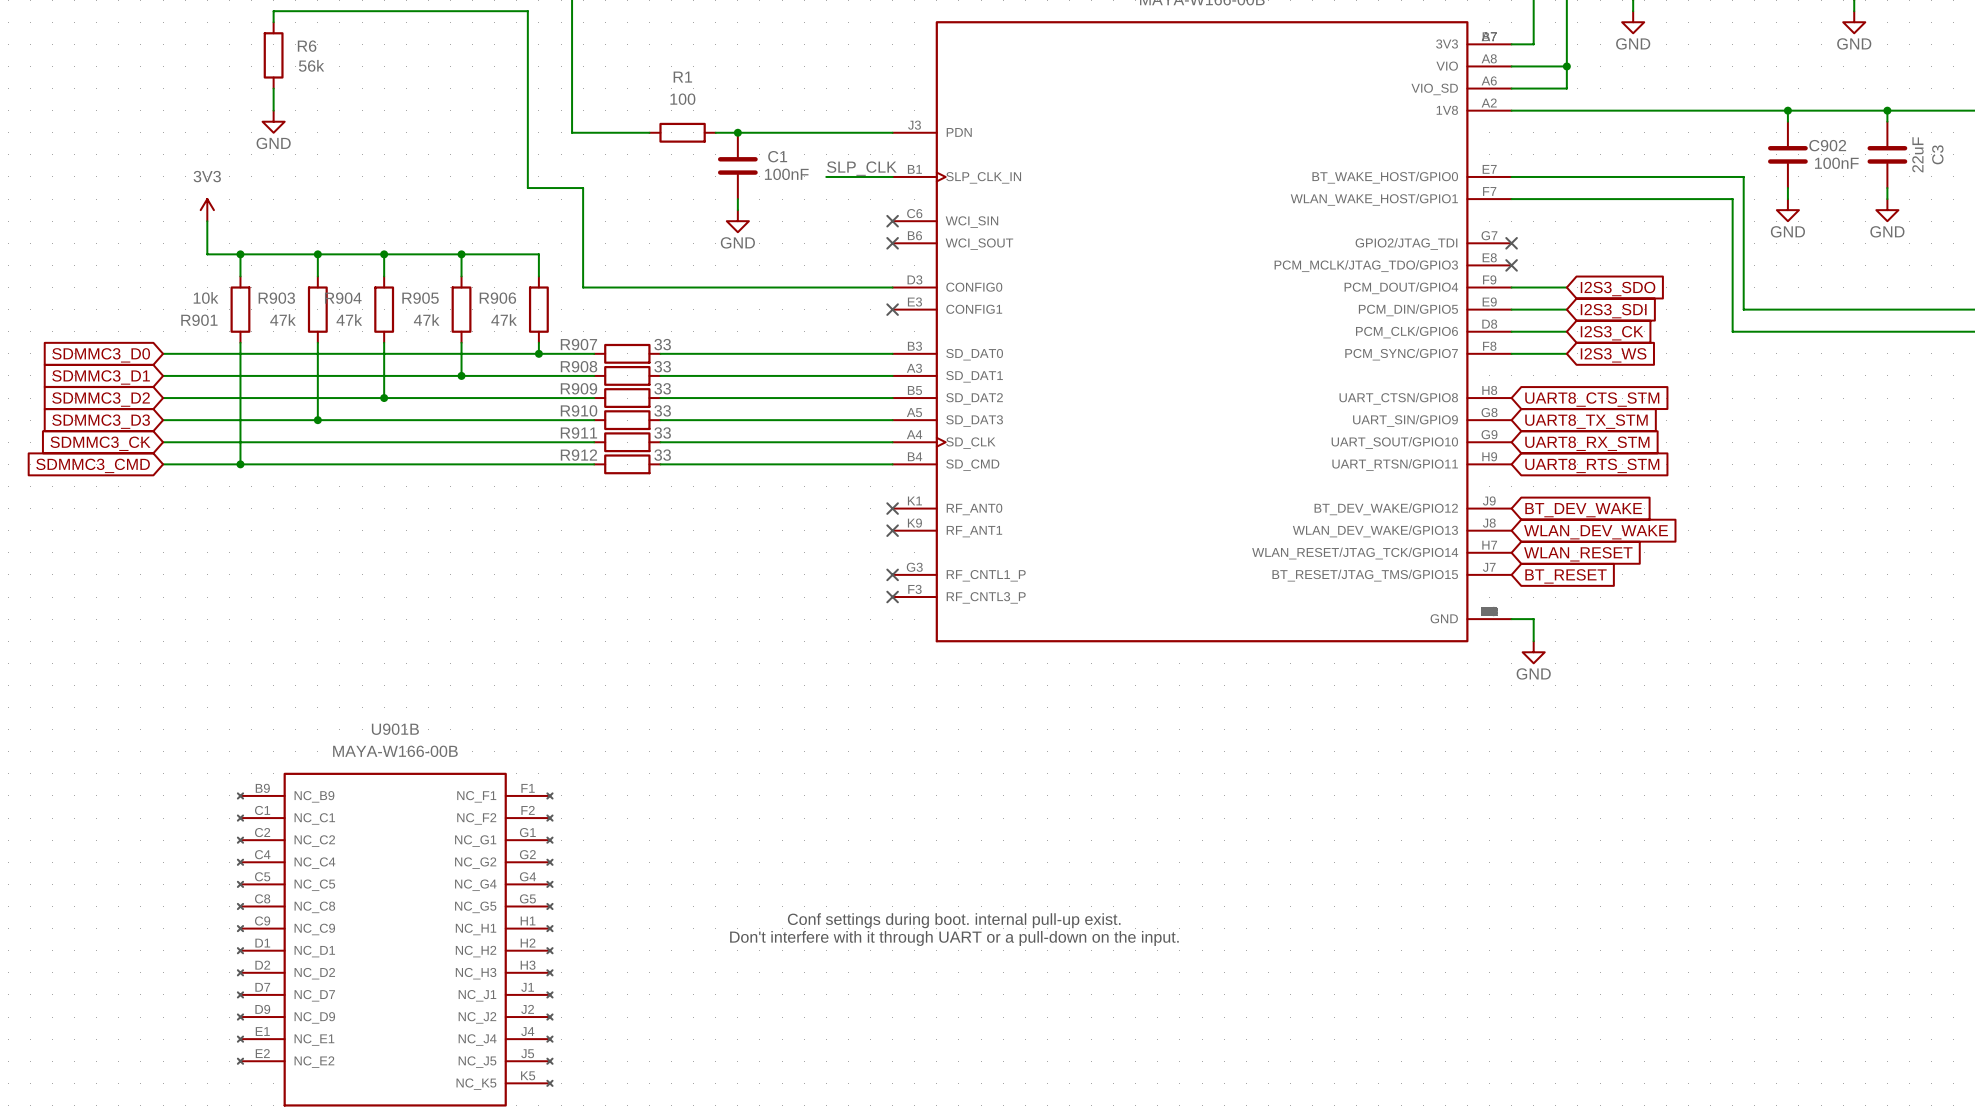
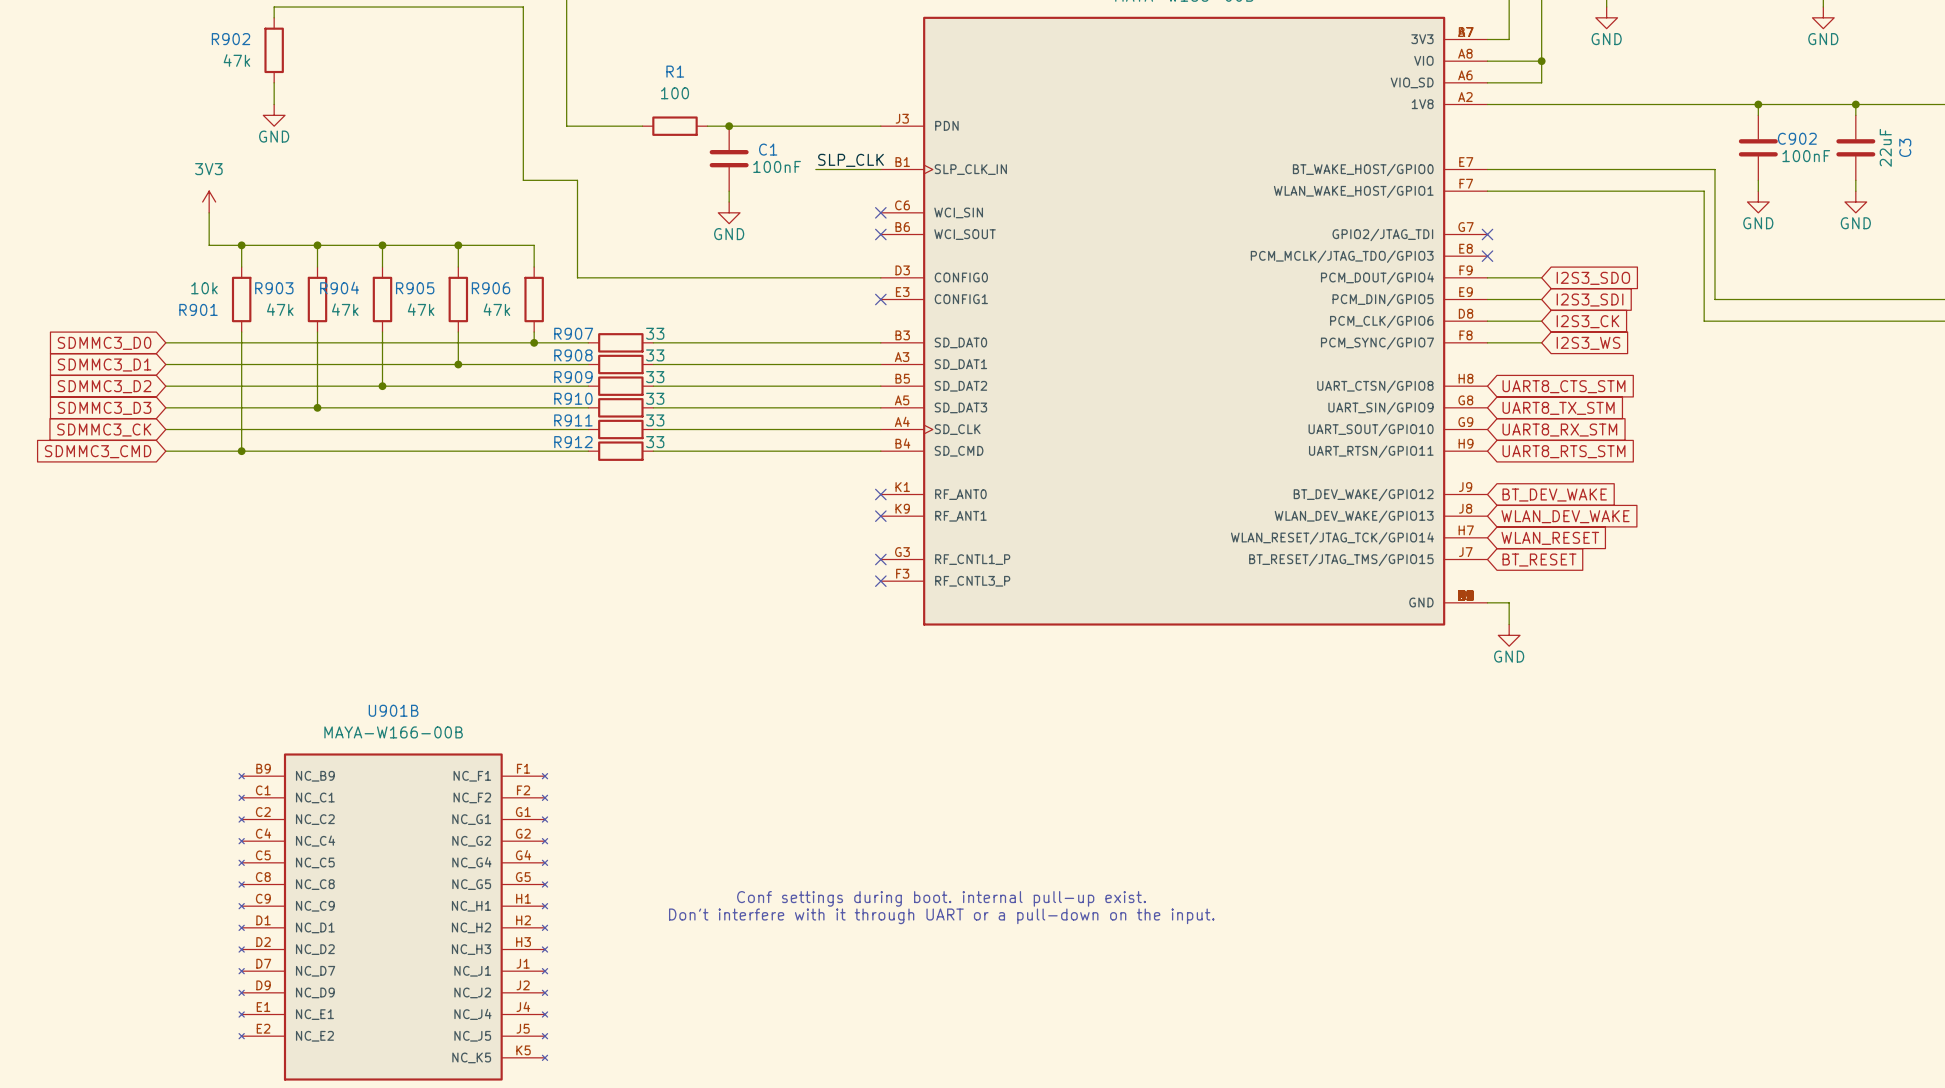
R6 name: R6 (307, 46) -> R902 (231, 39)
R6 value: 56k (311, 65) -> 47k (236, 60)

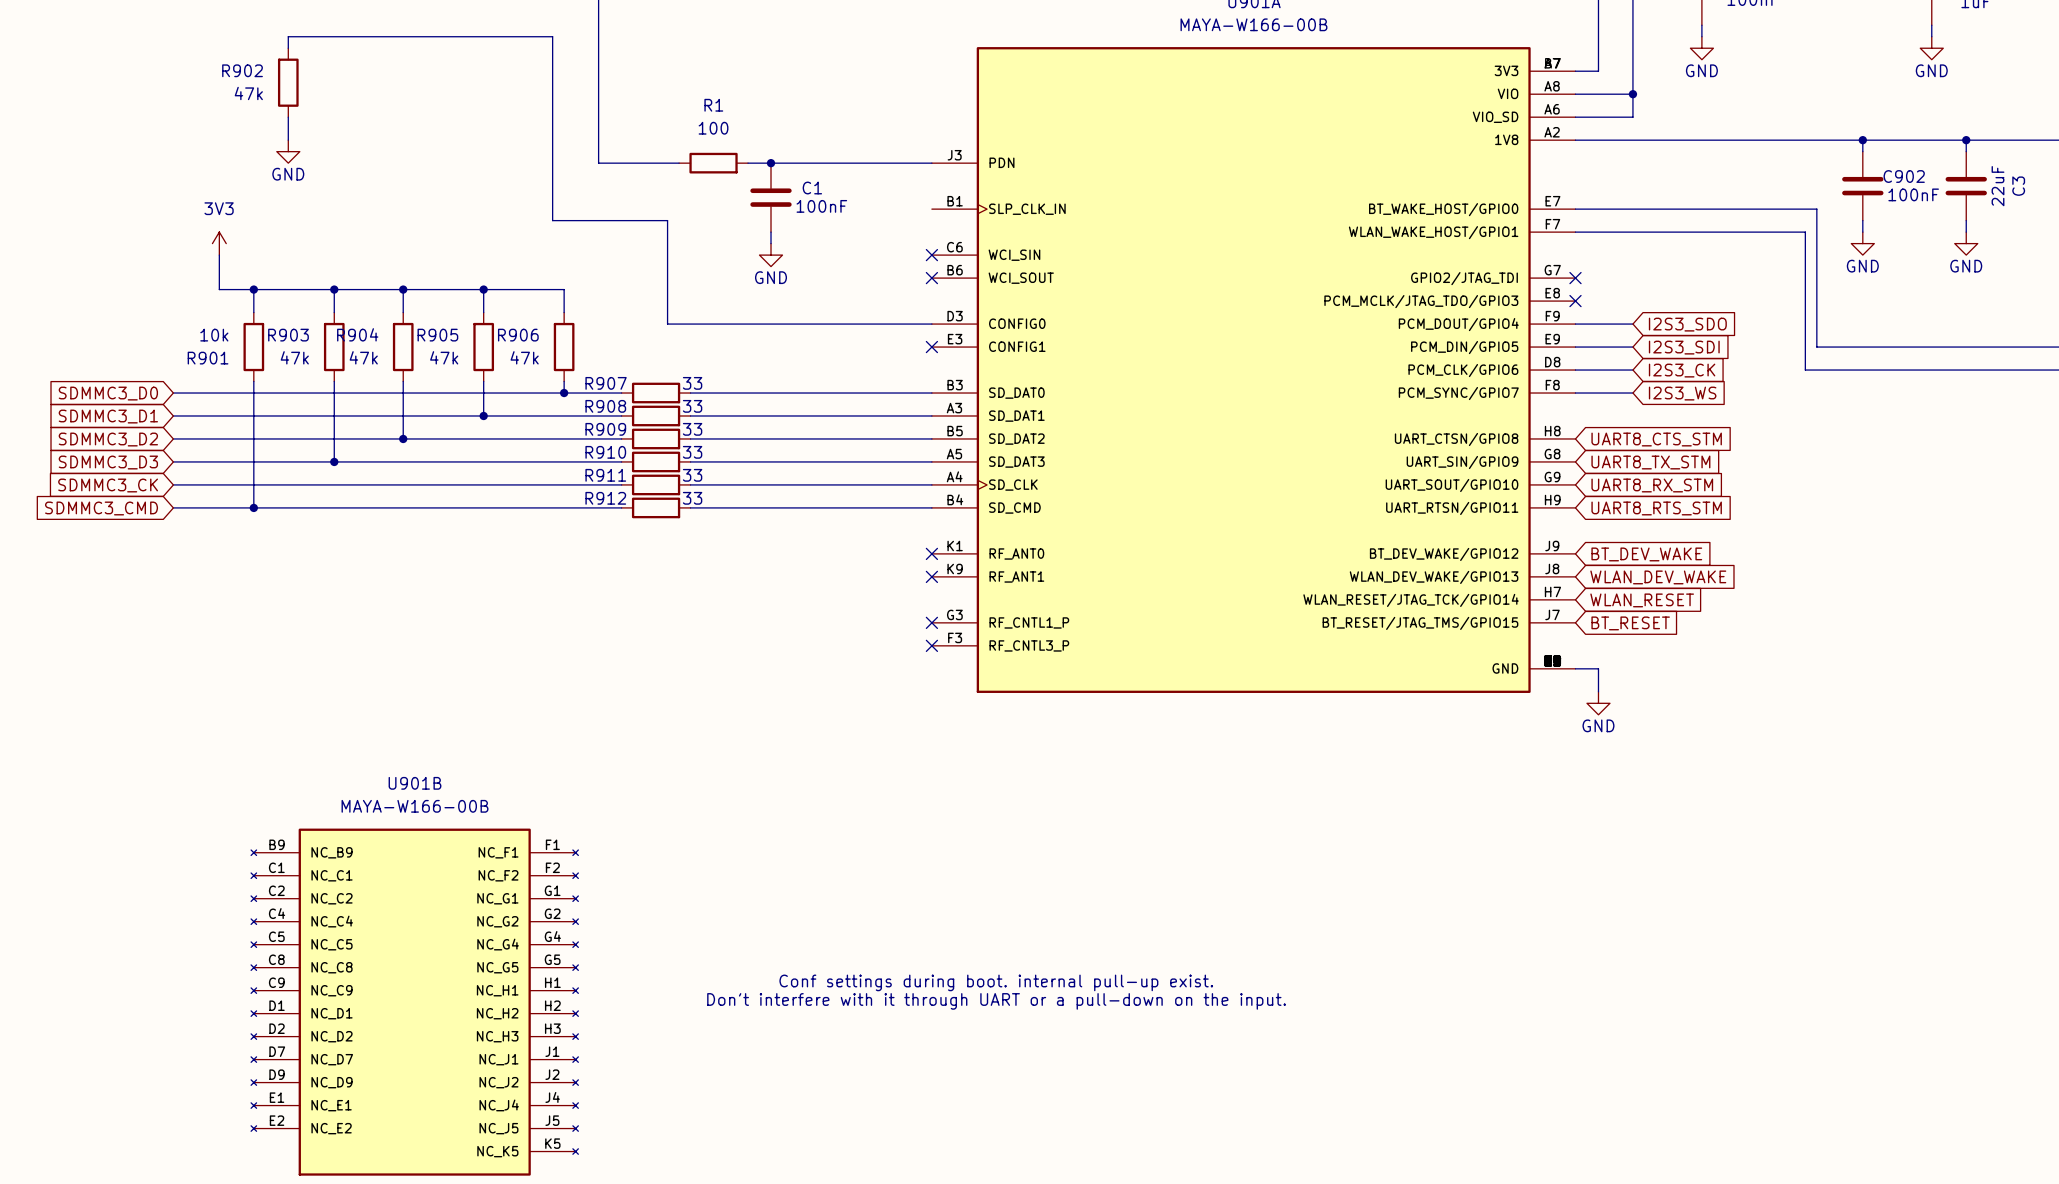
label: SLP_CLK (850, 160) -> none
wire: (815, 169) (880, 169) -> none
wire: (577, 180) (577, 277) (631, 277) -> (610, 220) (667, 220) (667, 324)

